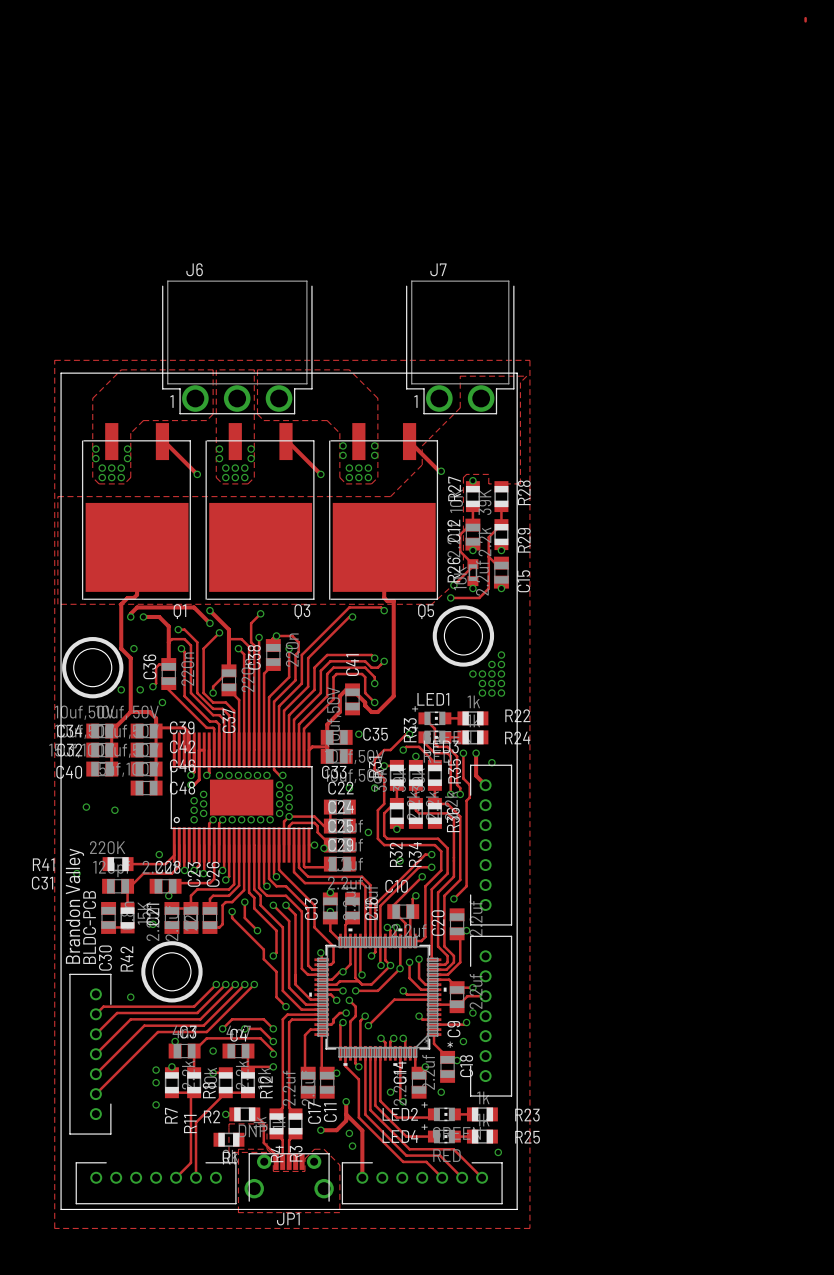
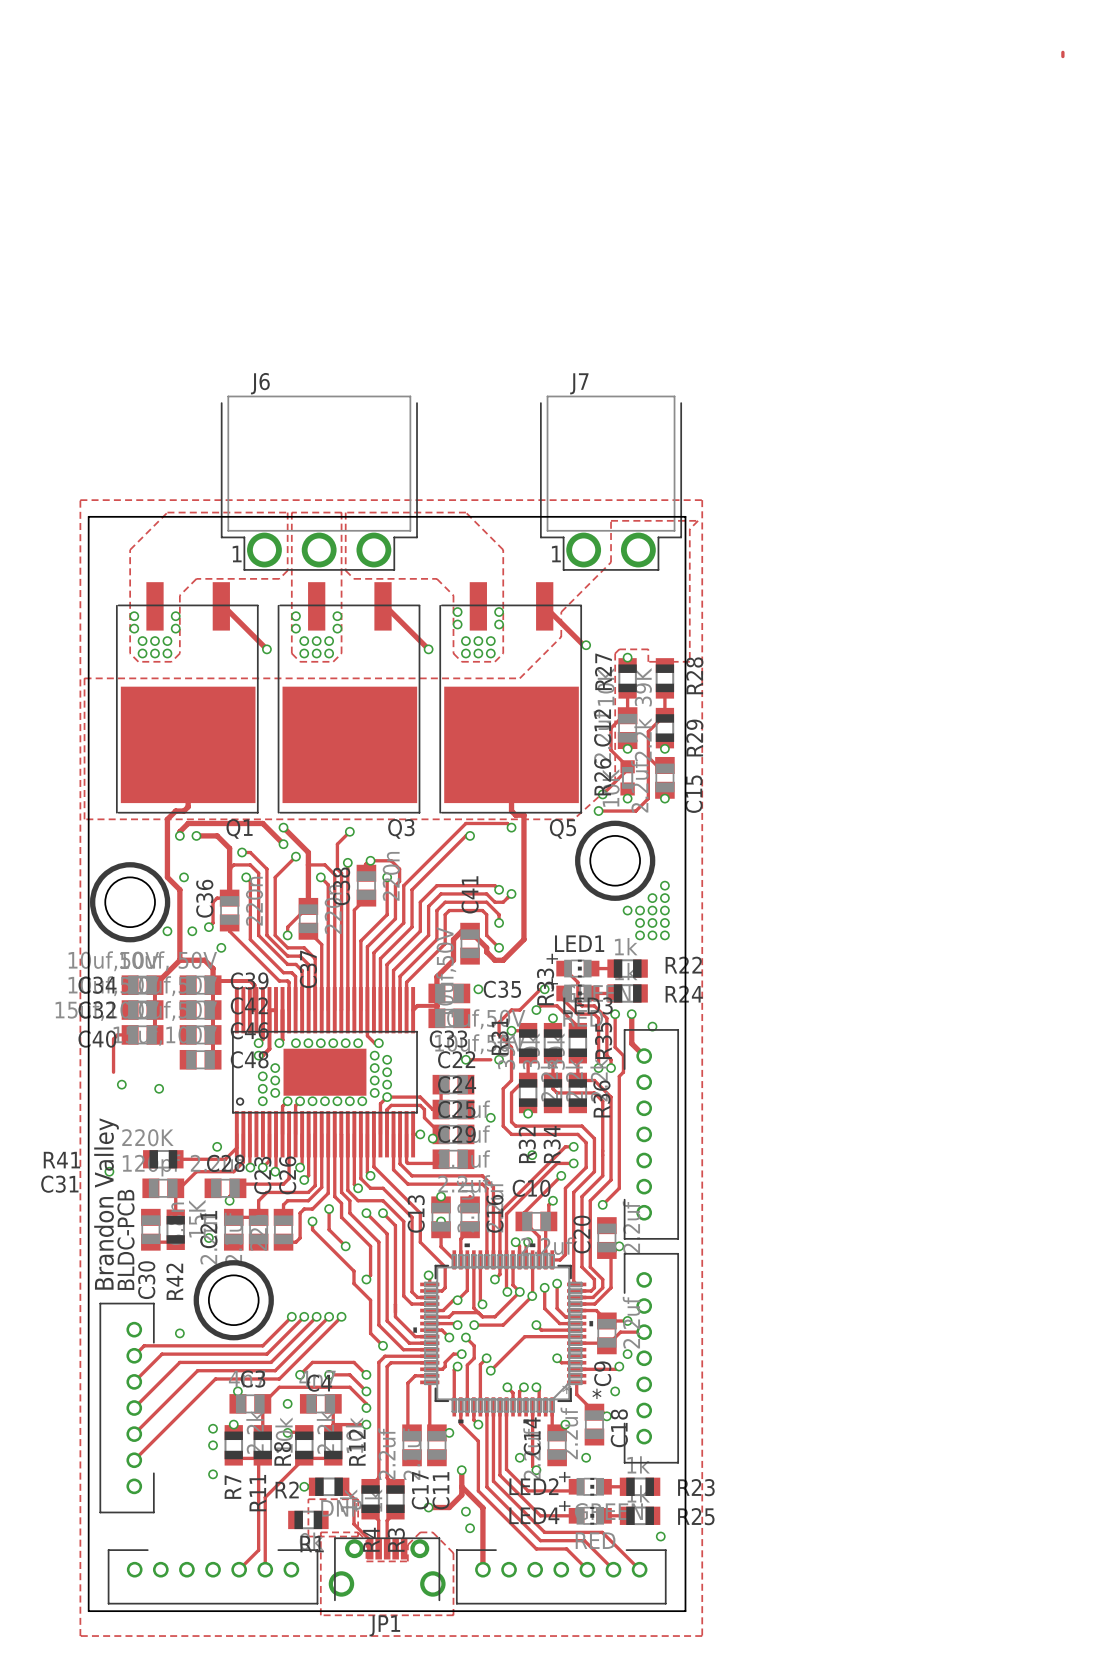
track: none -> (130, 1034) (117, 1034) (113, 1039) (113, 1072)
track: none -> (465, 1059) (490, 1059)

